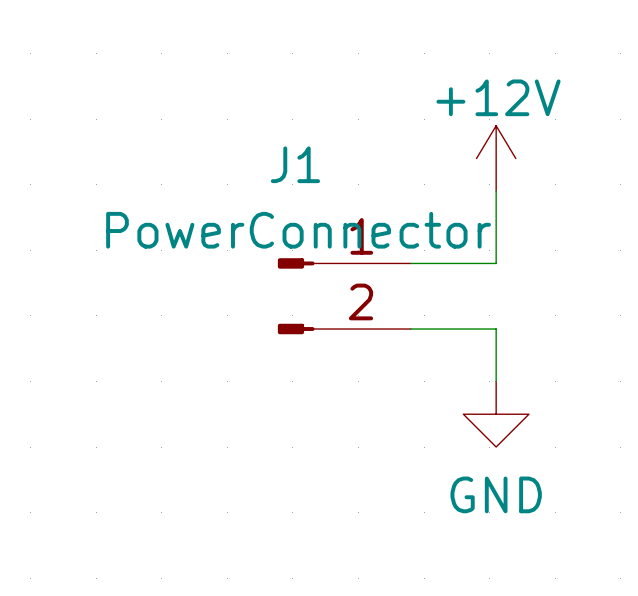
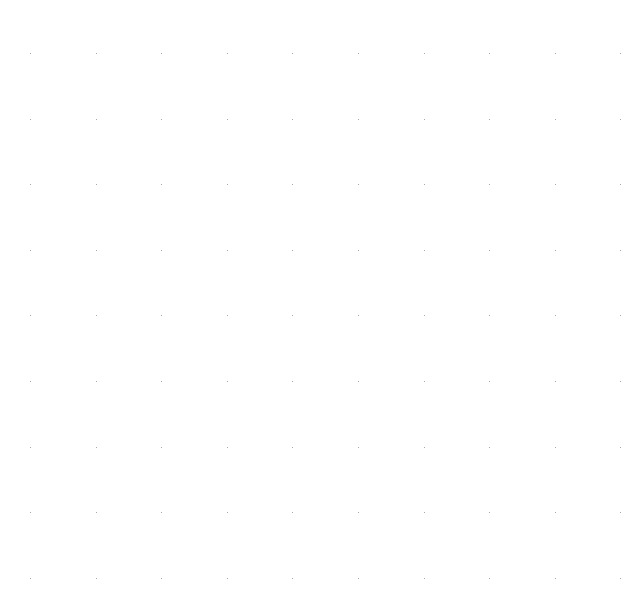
power symbol: +12V (496, 158) -> none
wire: (496, 191) (496, 263) (410, 263) -> none
J1: PowerConnector (344, 296) -> none
wire: (410, 329) (496, 329) (496, 381) -> none
power symbol: GND (496, 414) -> none

